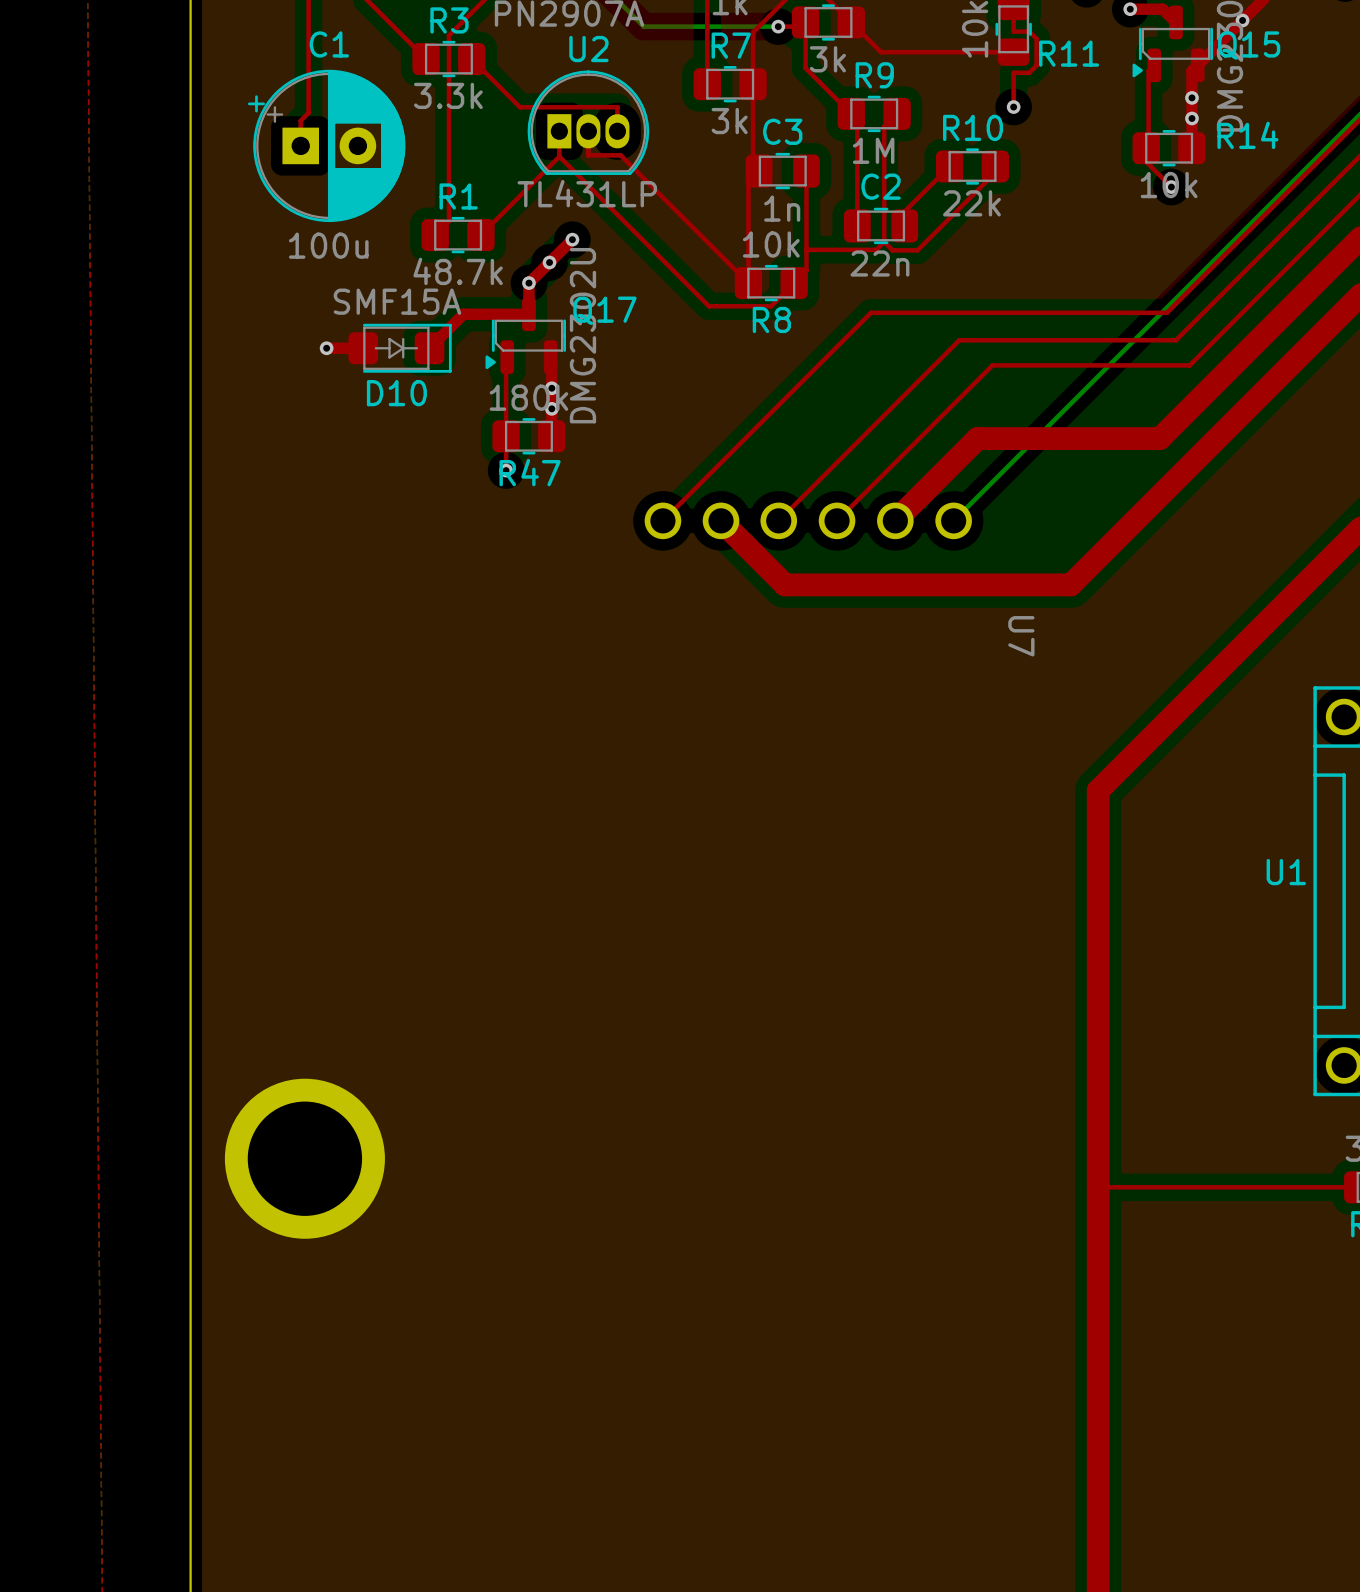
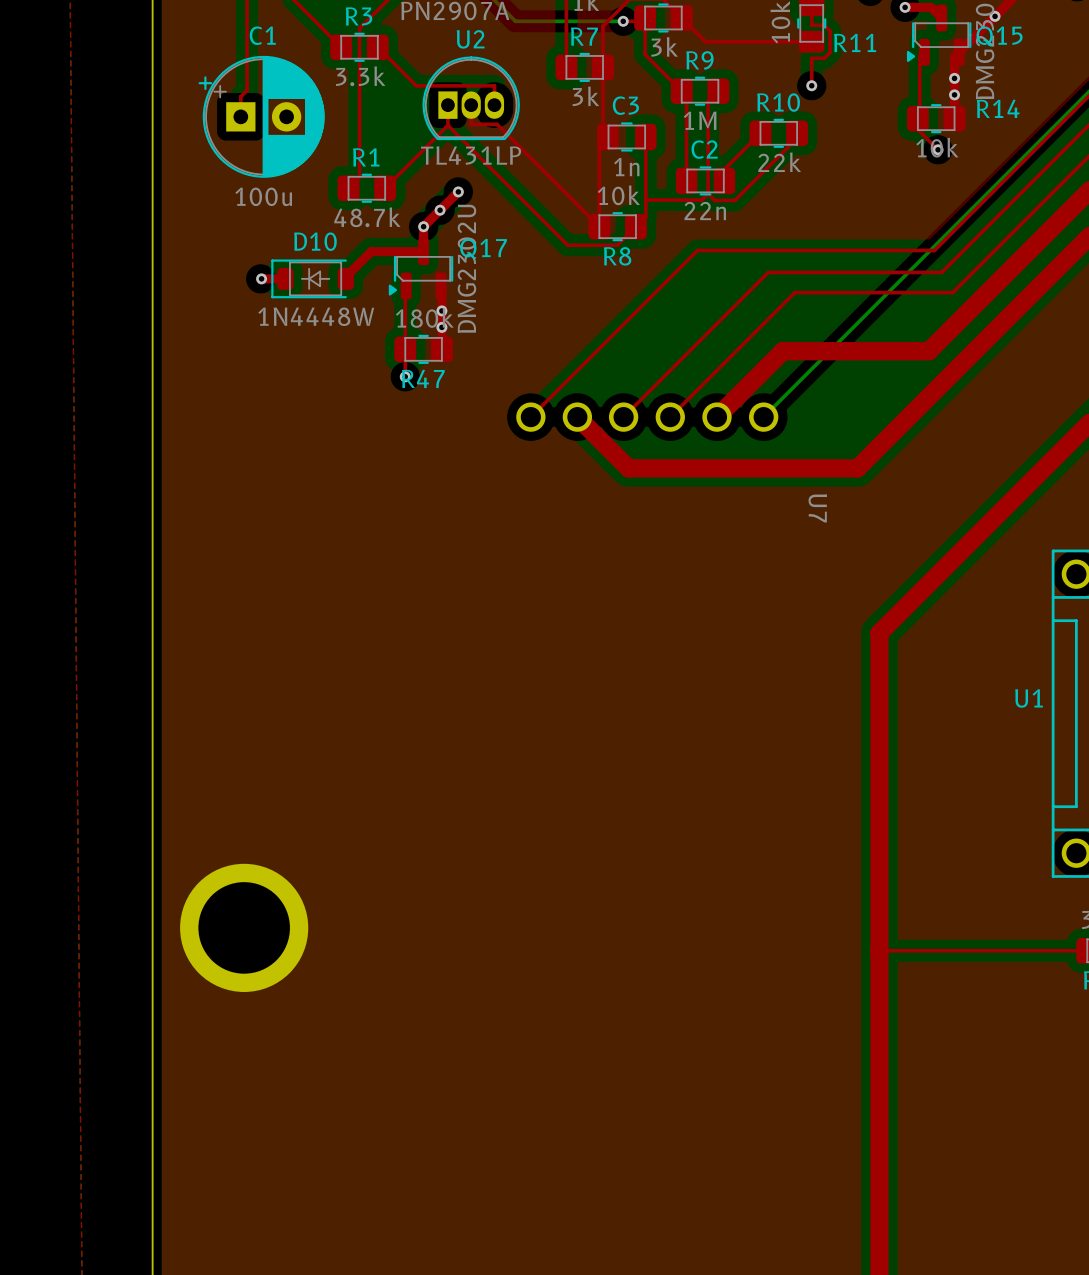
D10 value: SMF15A (397, 301) -> 1N4448W (316, 316)
D10 footprint: [348, 323, 452, 373] -> [271, 259, 355, 299]
D10 name position: D10 (396, 393) -> D10 (315, 241)

